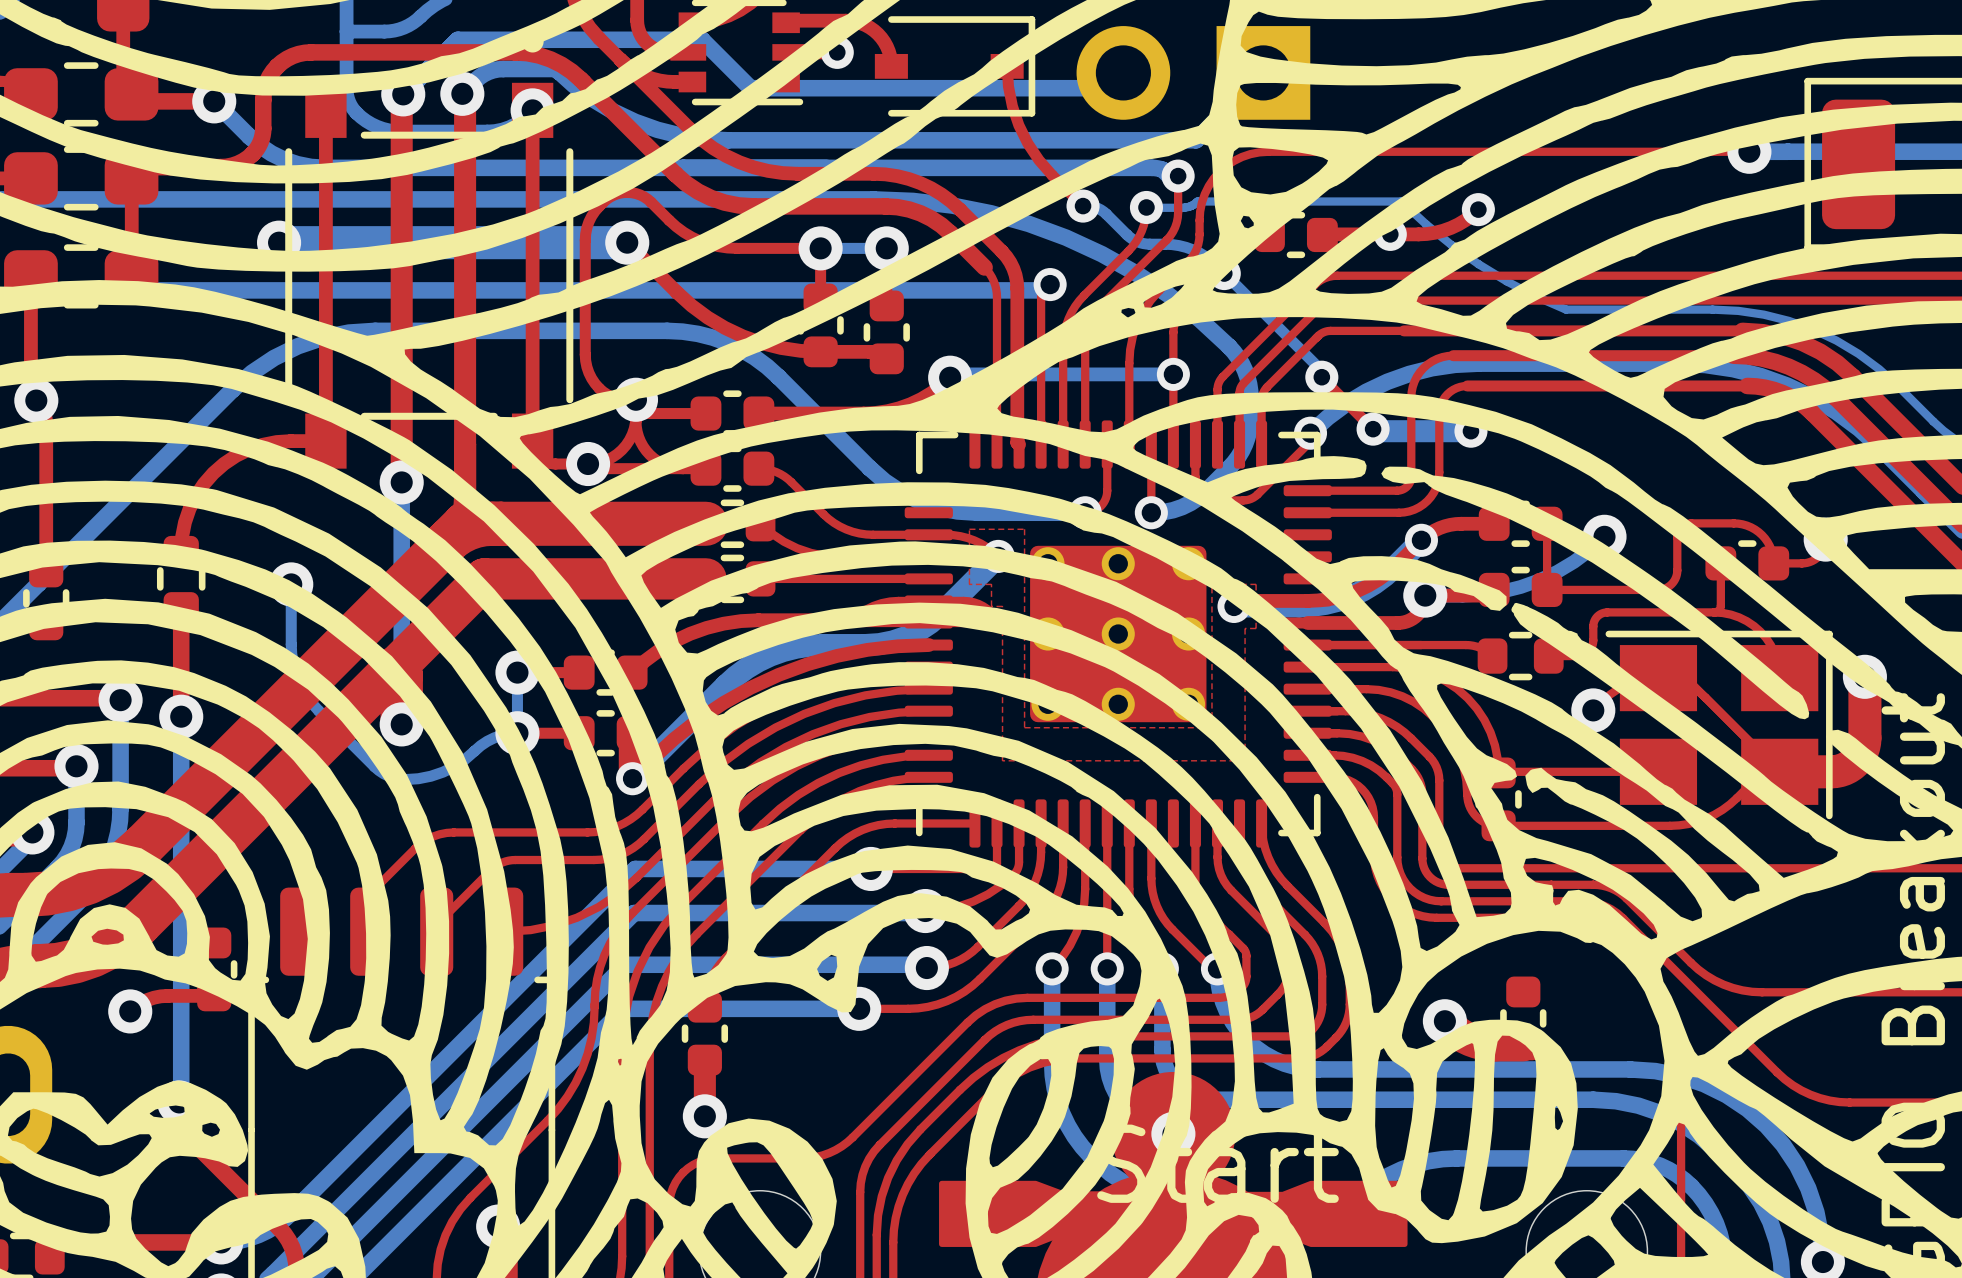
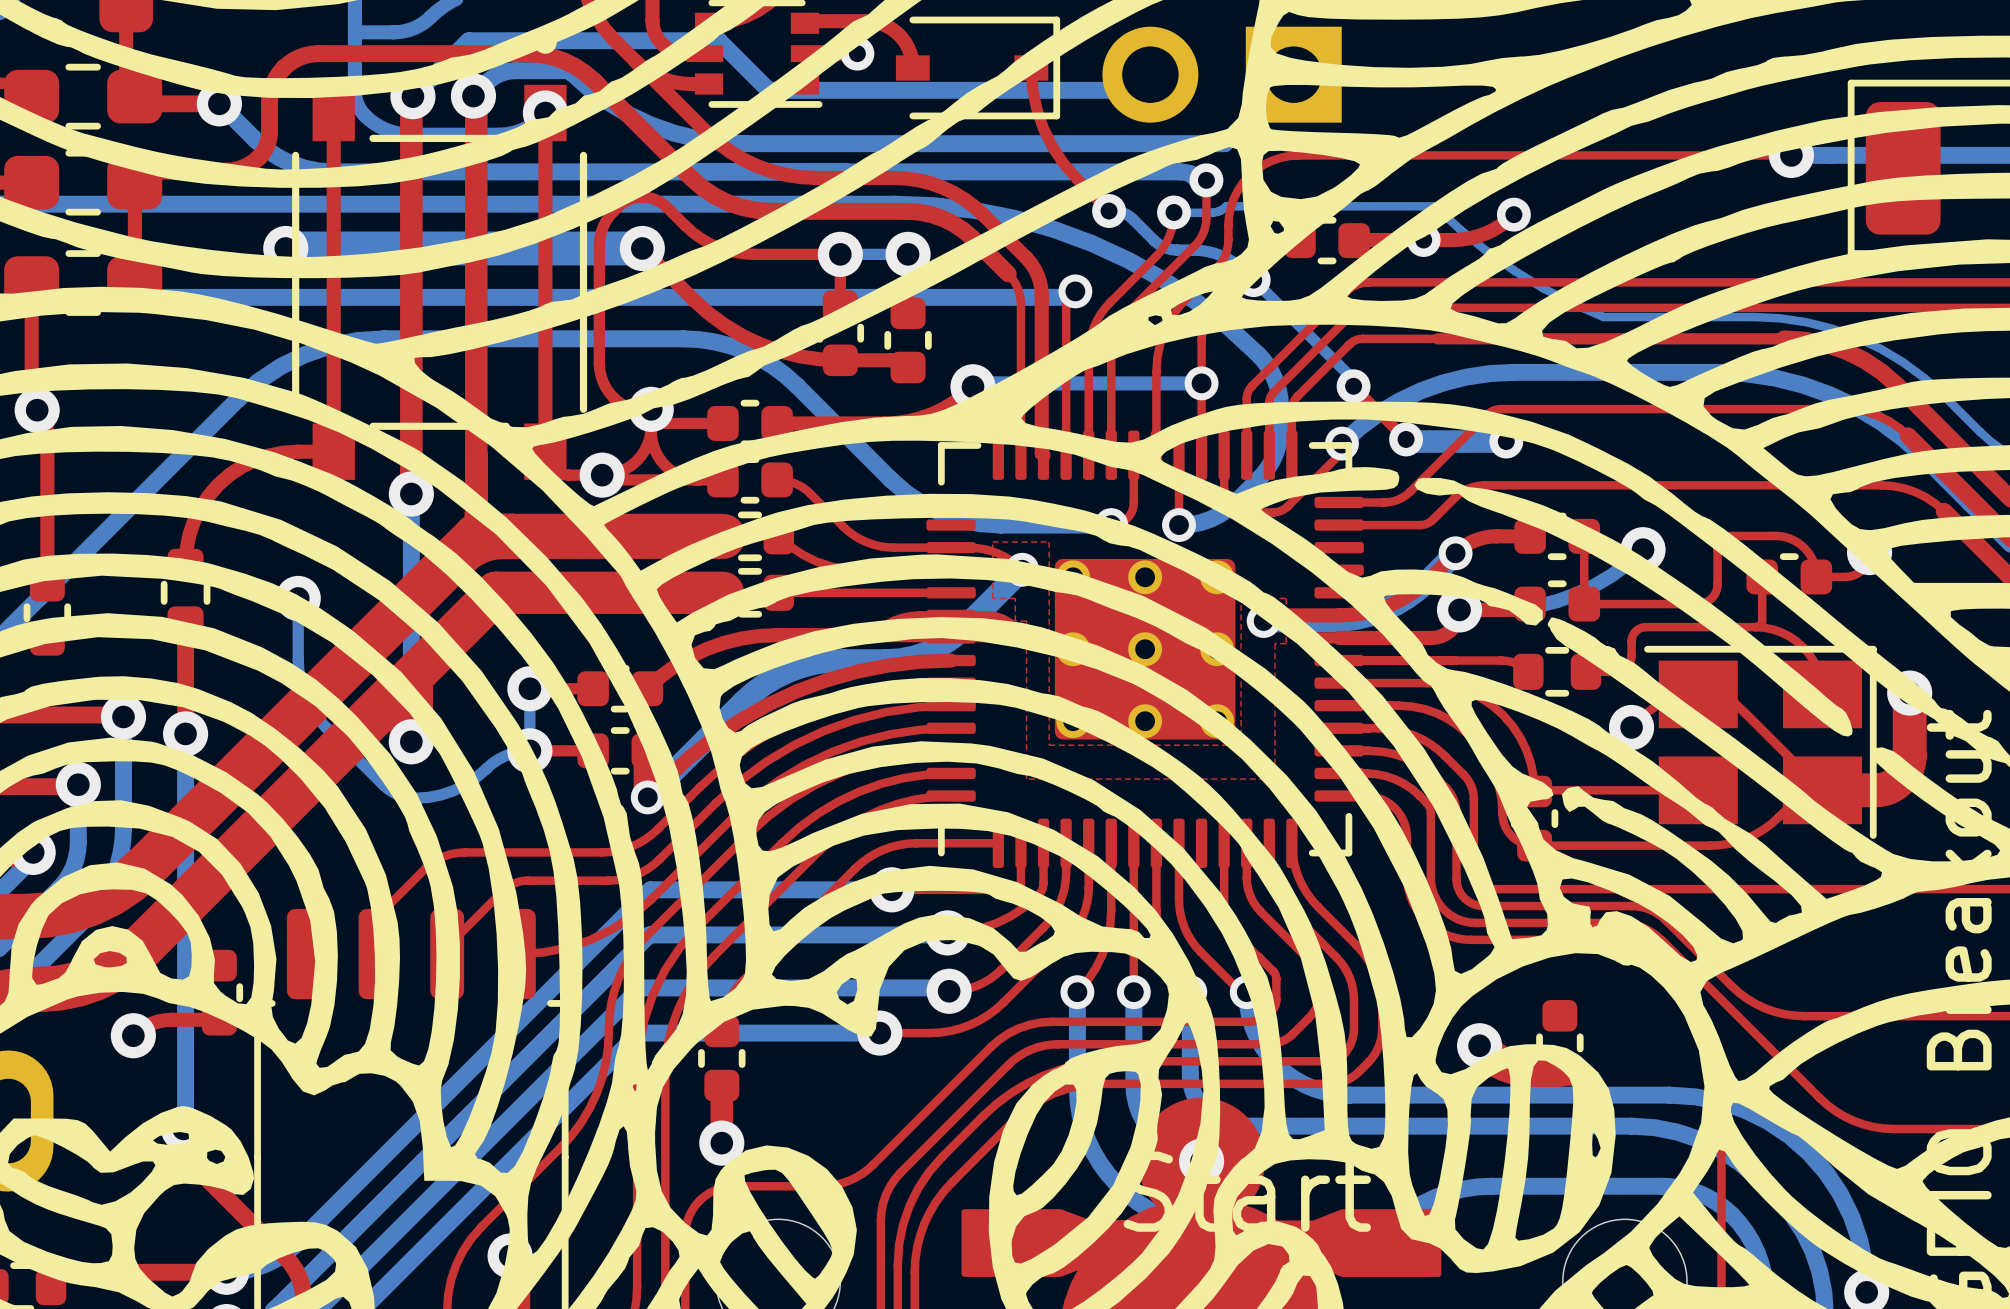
top track: (1863, 425) (1836, 398) (1814, 380) (1788, 366) (1761, 358) (1733, 355) (1447, 356) (1432, 361) (1423, 367) (1412, 386) (1411, 476) (1408, 485) (1398, 490) (1351, 490) -> (1908, 435) (1889, 421) (1878, 416) (1855, 409) (1843, 409) (1499, 409) (1487, 414) (1406, 494) (1398, 499) (1384, 502)
top track: (1898, 499) (1805, 406) (1790, 396) (1773, 389) (1747, 385) (1467, 385) (1450, 391) (1440, 406) (1438, 477) (1433, 492) (1427, 500) (1414, 509) (1404, 512) (1386, 512) -> (1944, 511) (1925, 497) (1915, 492) (1893, 486) (1881, 485) (1484, 485) (1472, 487) (1461, 492) (1431, 521) (1420, 525)

